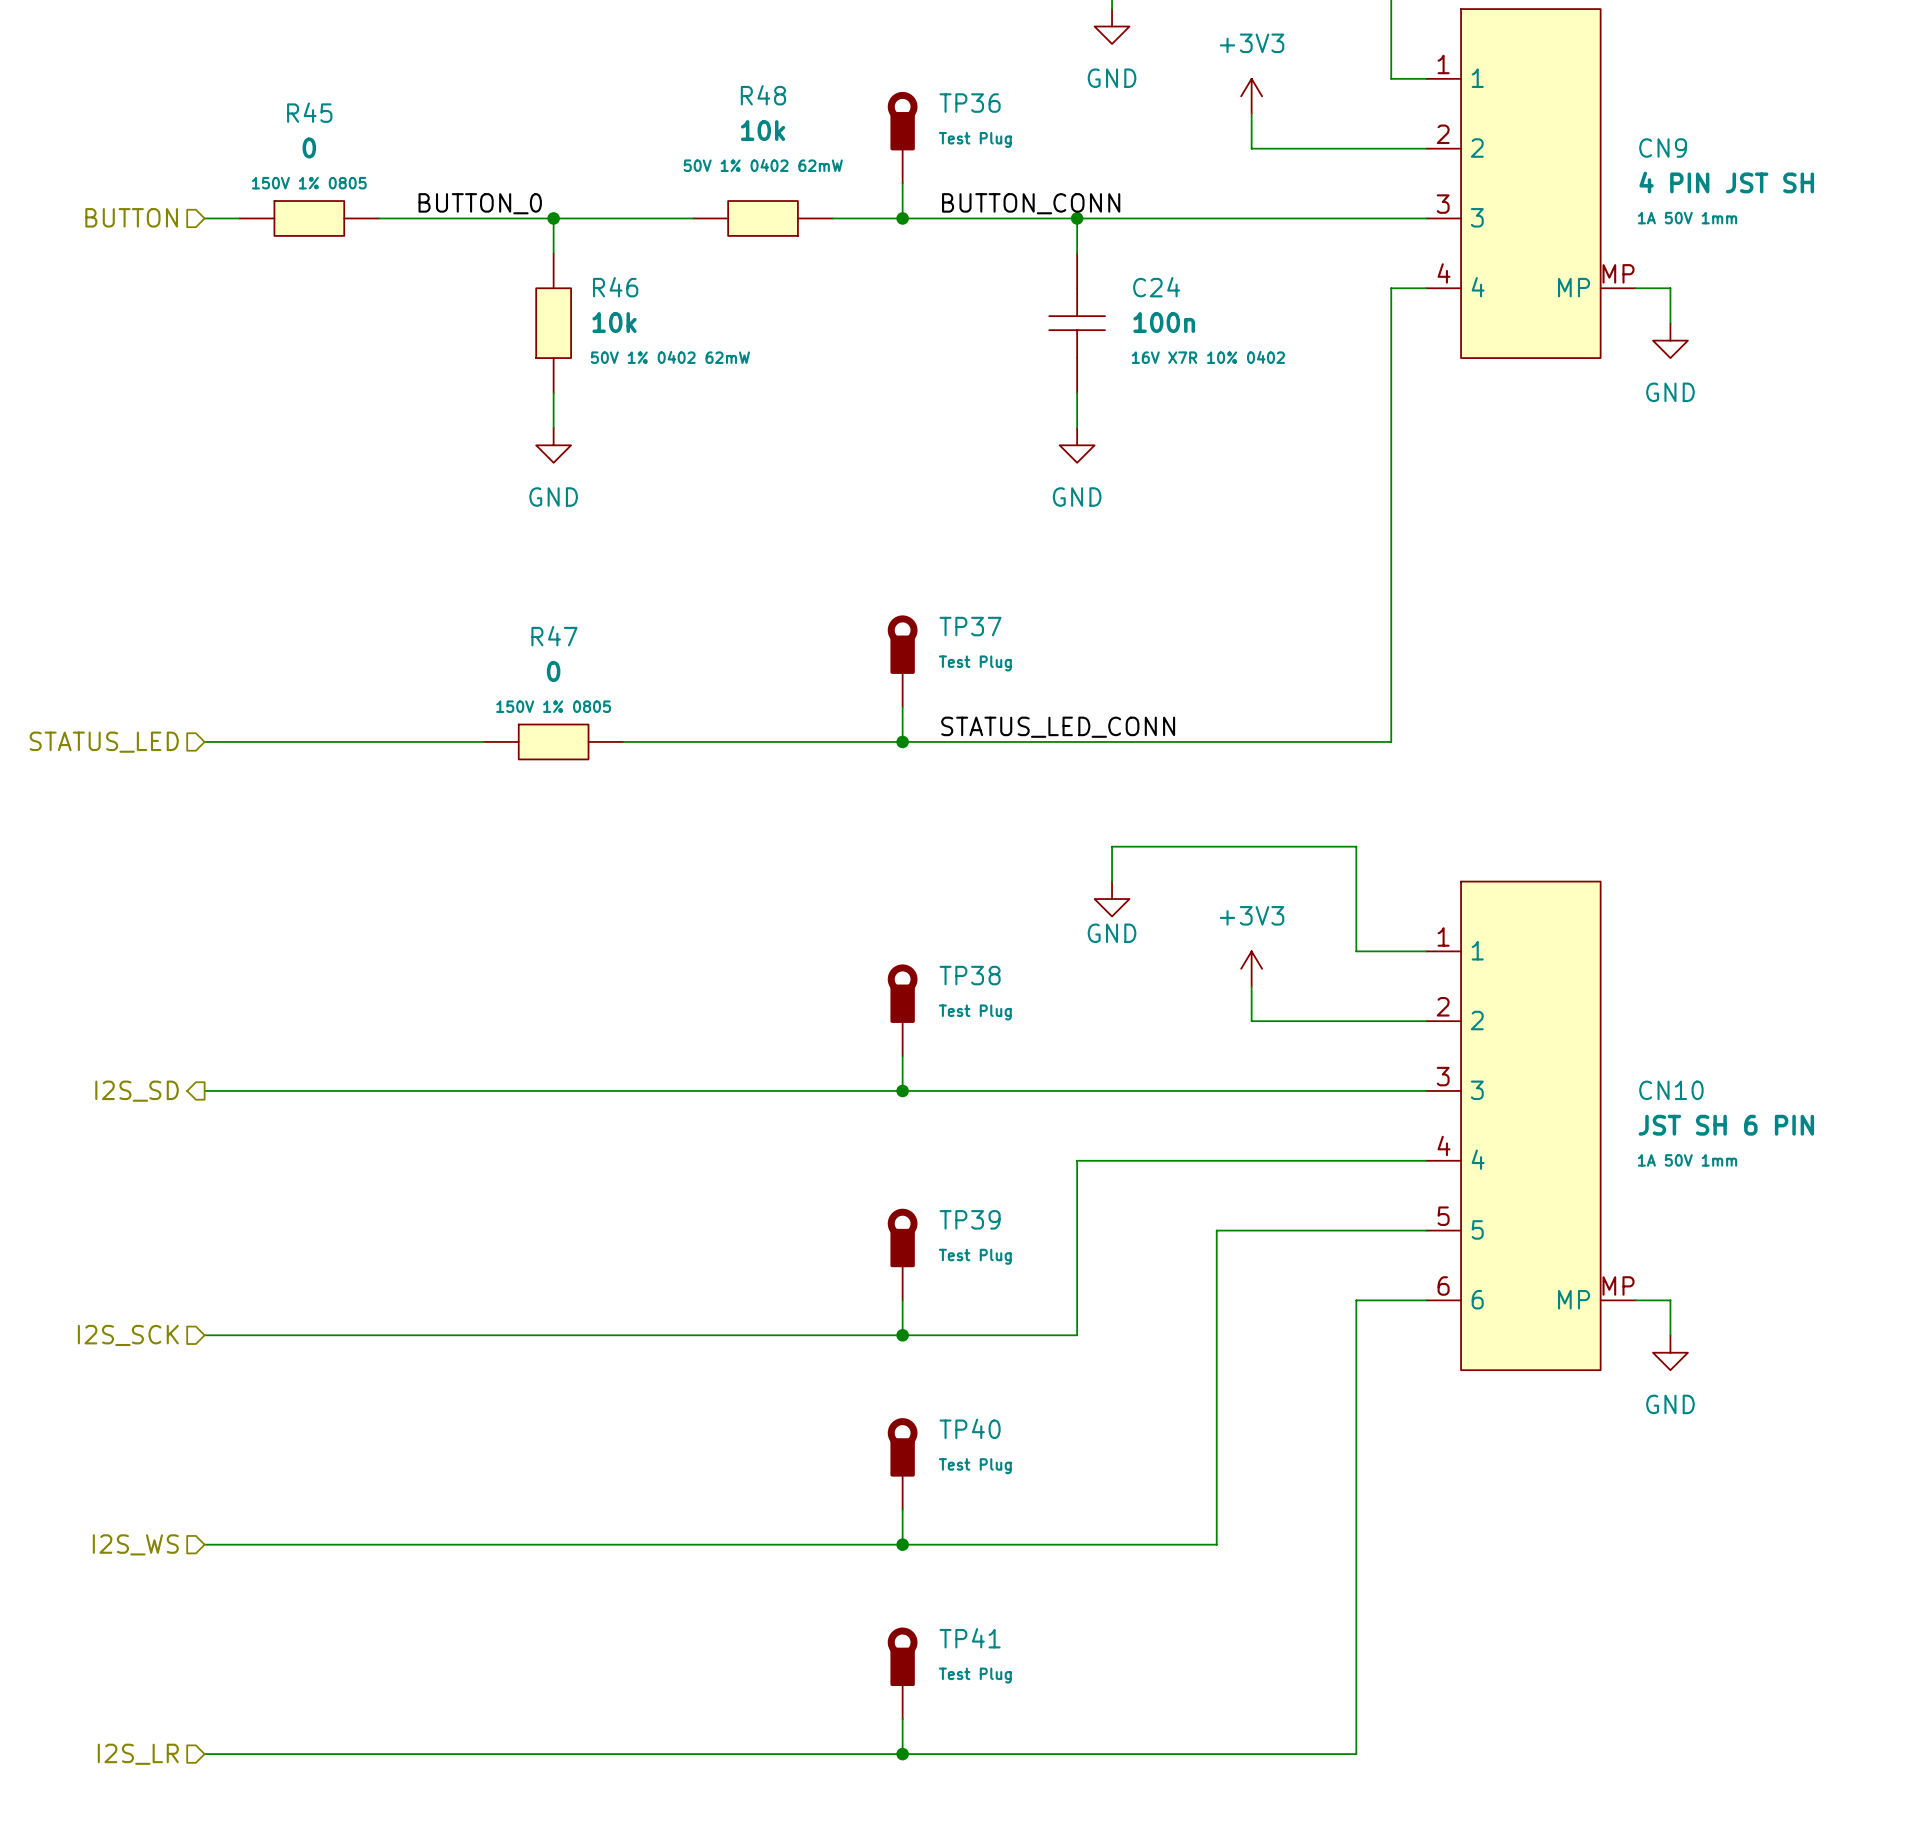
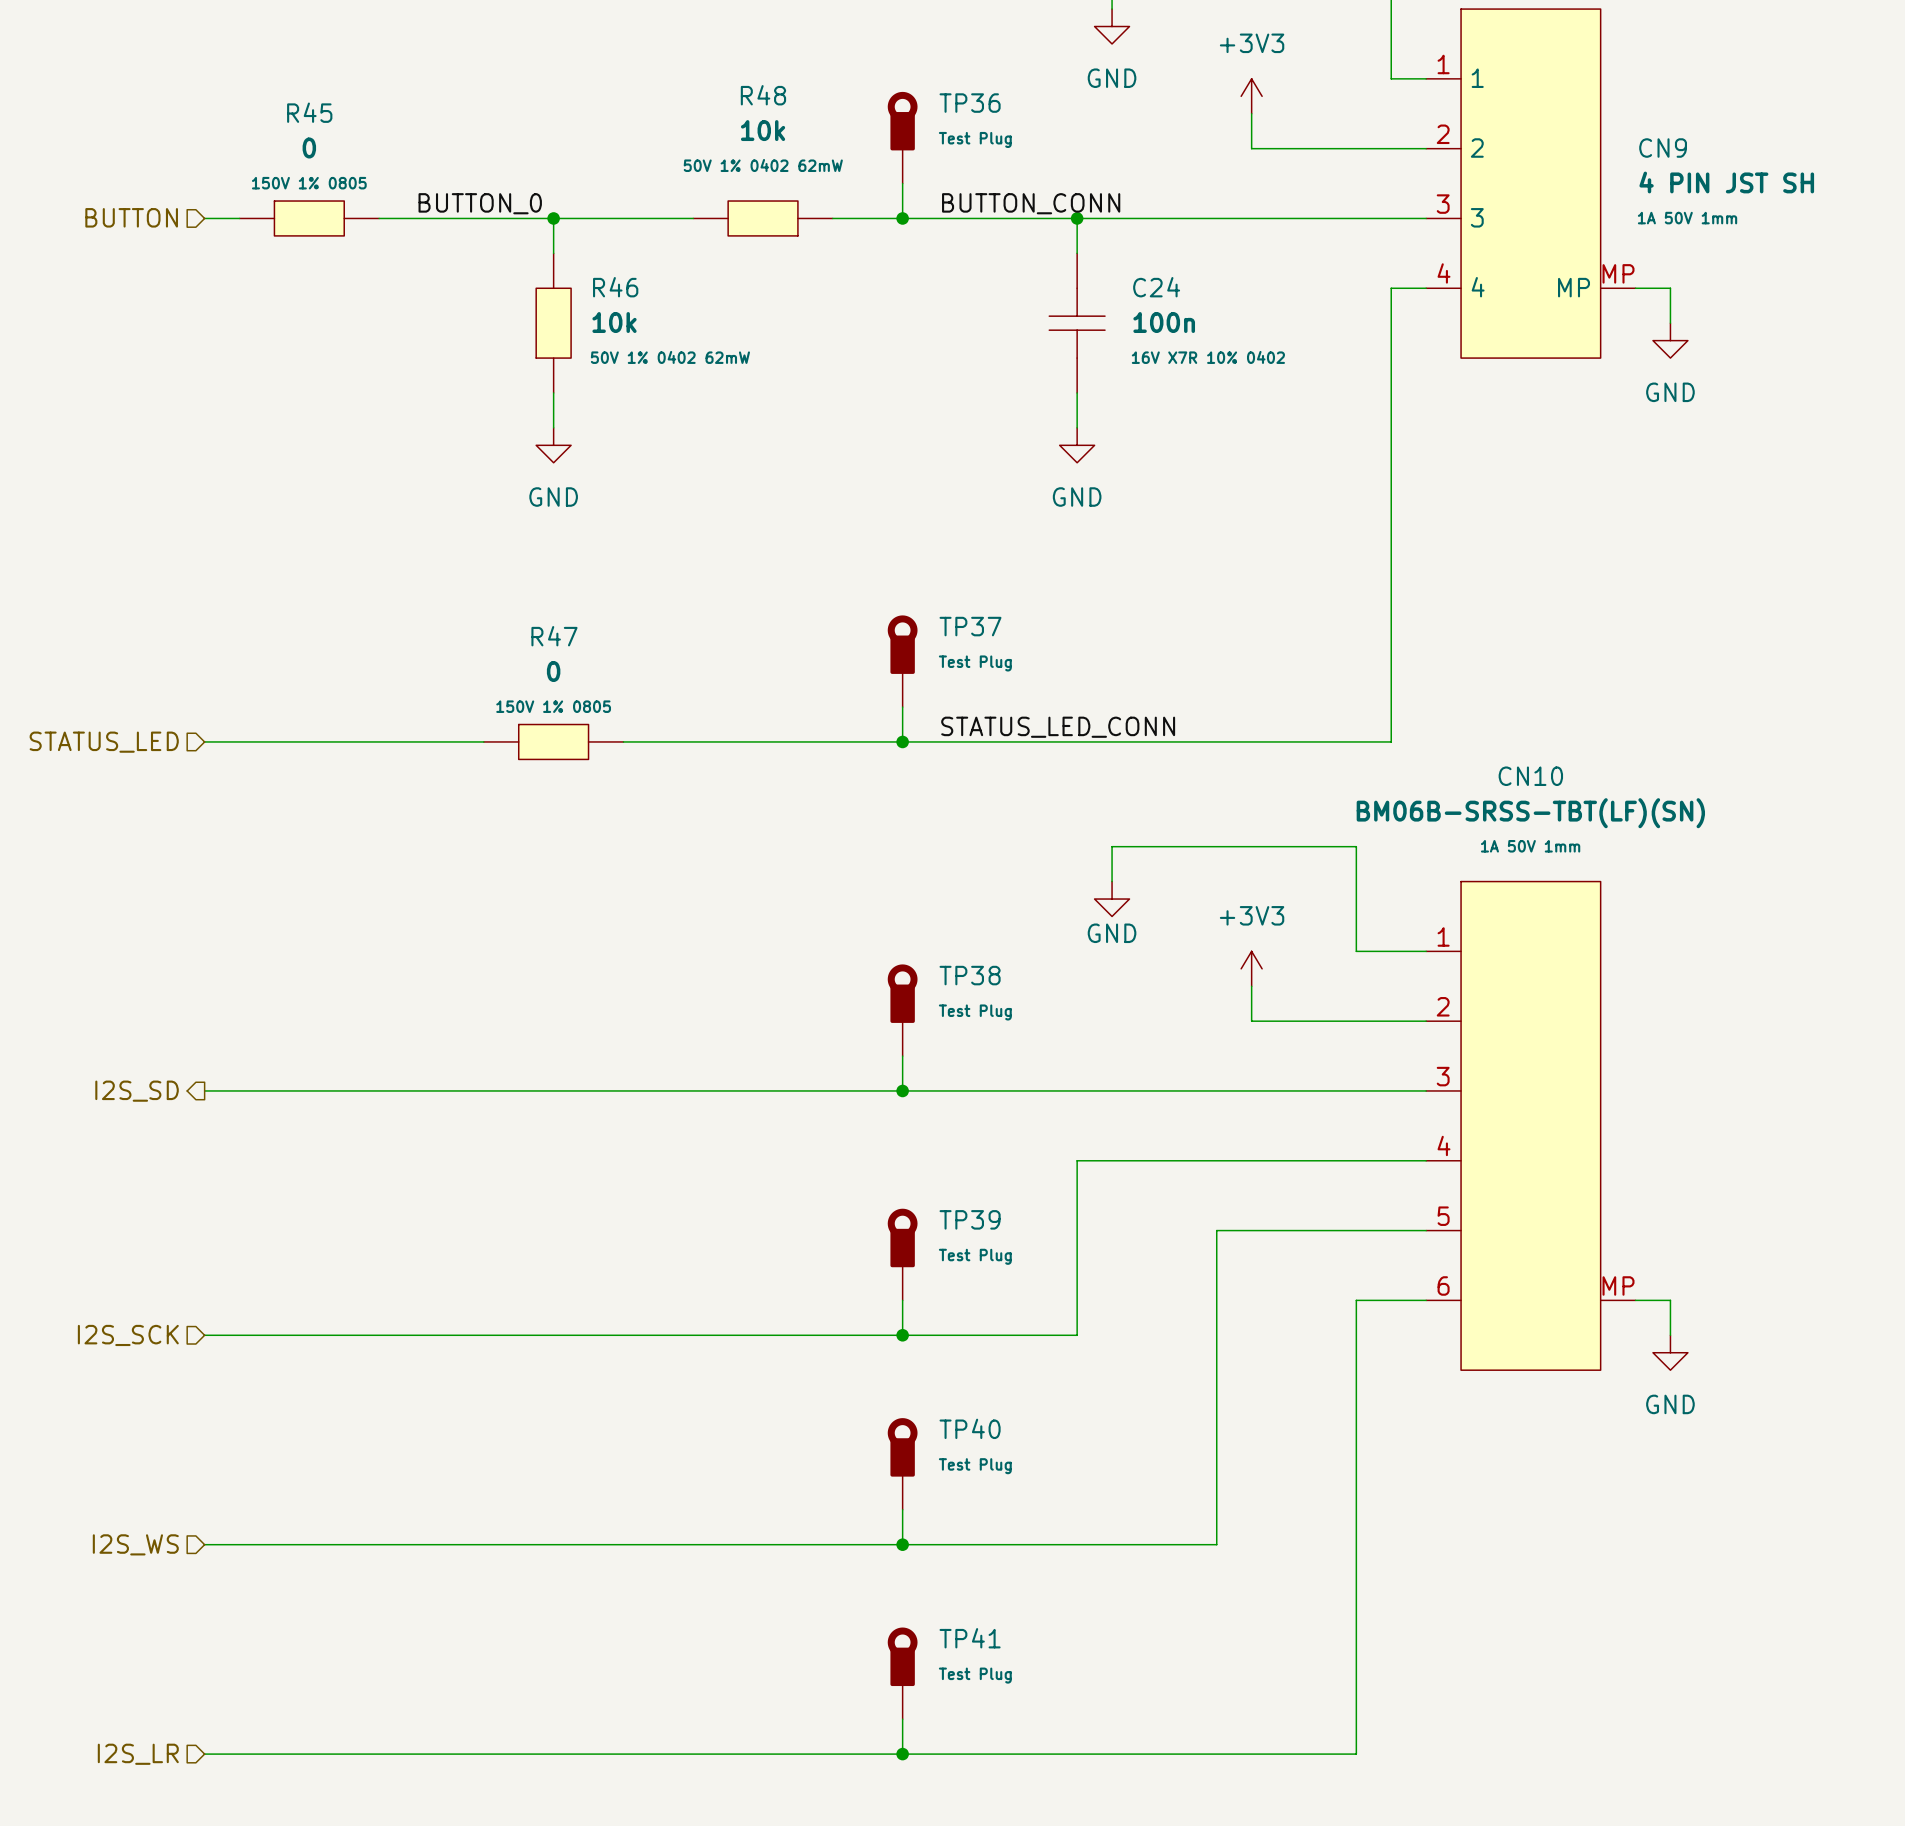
CN10 pin name: 1 (1477, 950) -> none
CN10 pin name: 2 (1477, 1020) -> none
CN10 pin name: 3 (1477, 1090) -> none
CN10 name position: CN10 (1671, 1090) -> CN10 (1530, 776)
CN10 value: JST SH 6 PIN (1726, 1125) -> BM06B-SRSS-TBT(LF)(SN) (1530, 813)
CN10 pin name: 4 (1478, 1159) -> none
CN10 text position: 1A 50V 1mm (1687, 1160) -> 1A 50V 1mm (1530, 846)
CN10 pin name: 5 (1477, 1229) -> none
CN10 pin name: 6 (1477, 1299) -> none
CN10 pin name: MP (1574, 1299) -> none

